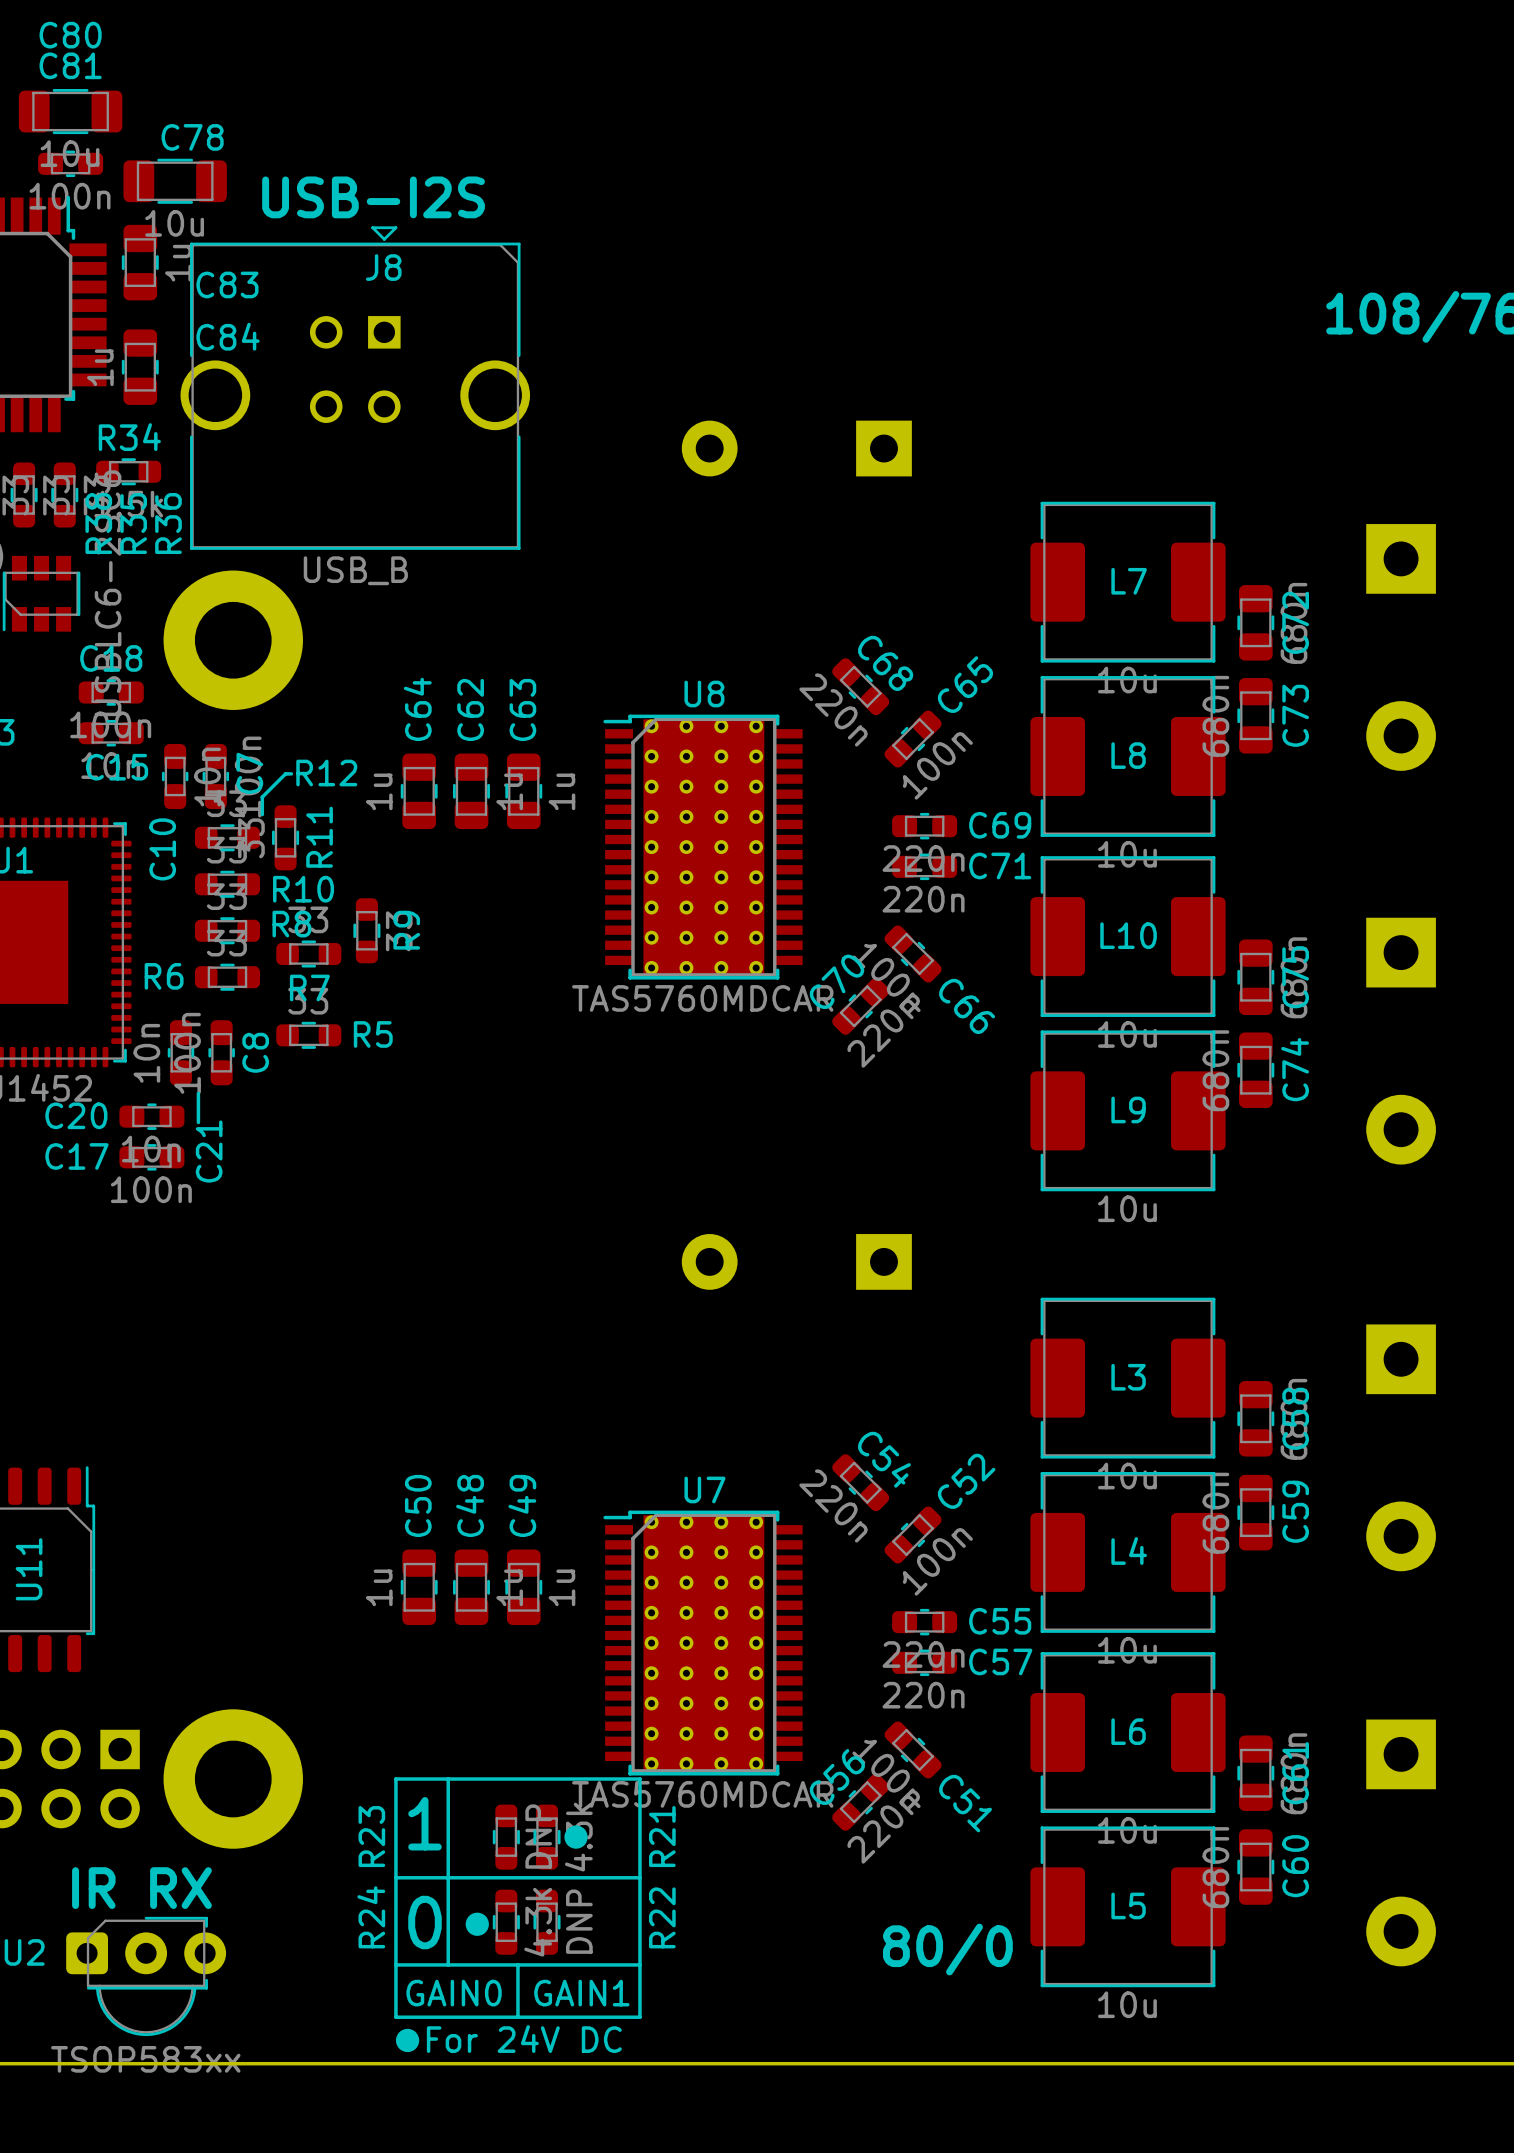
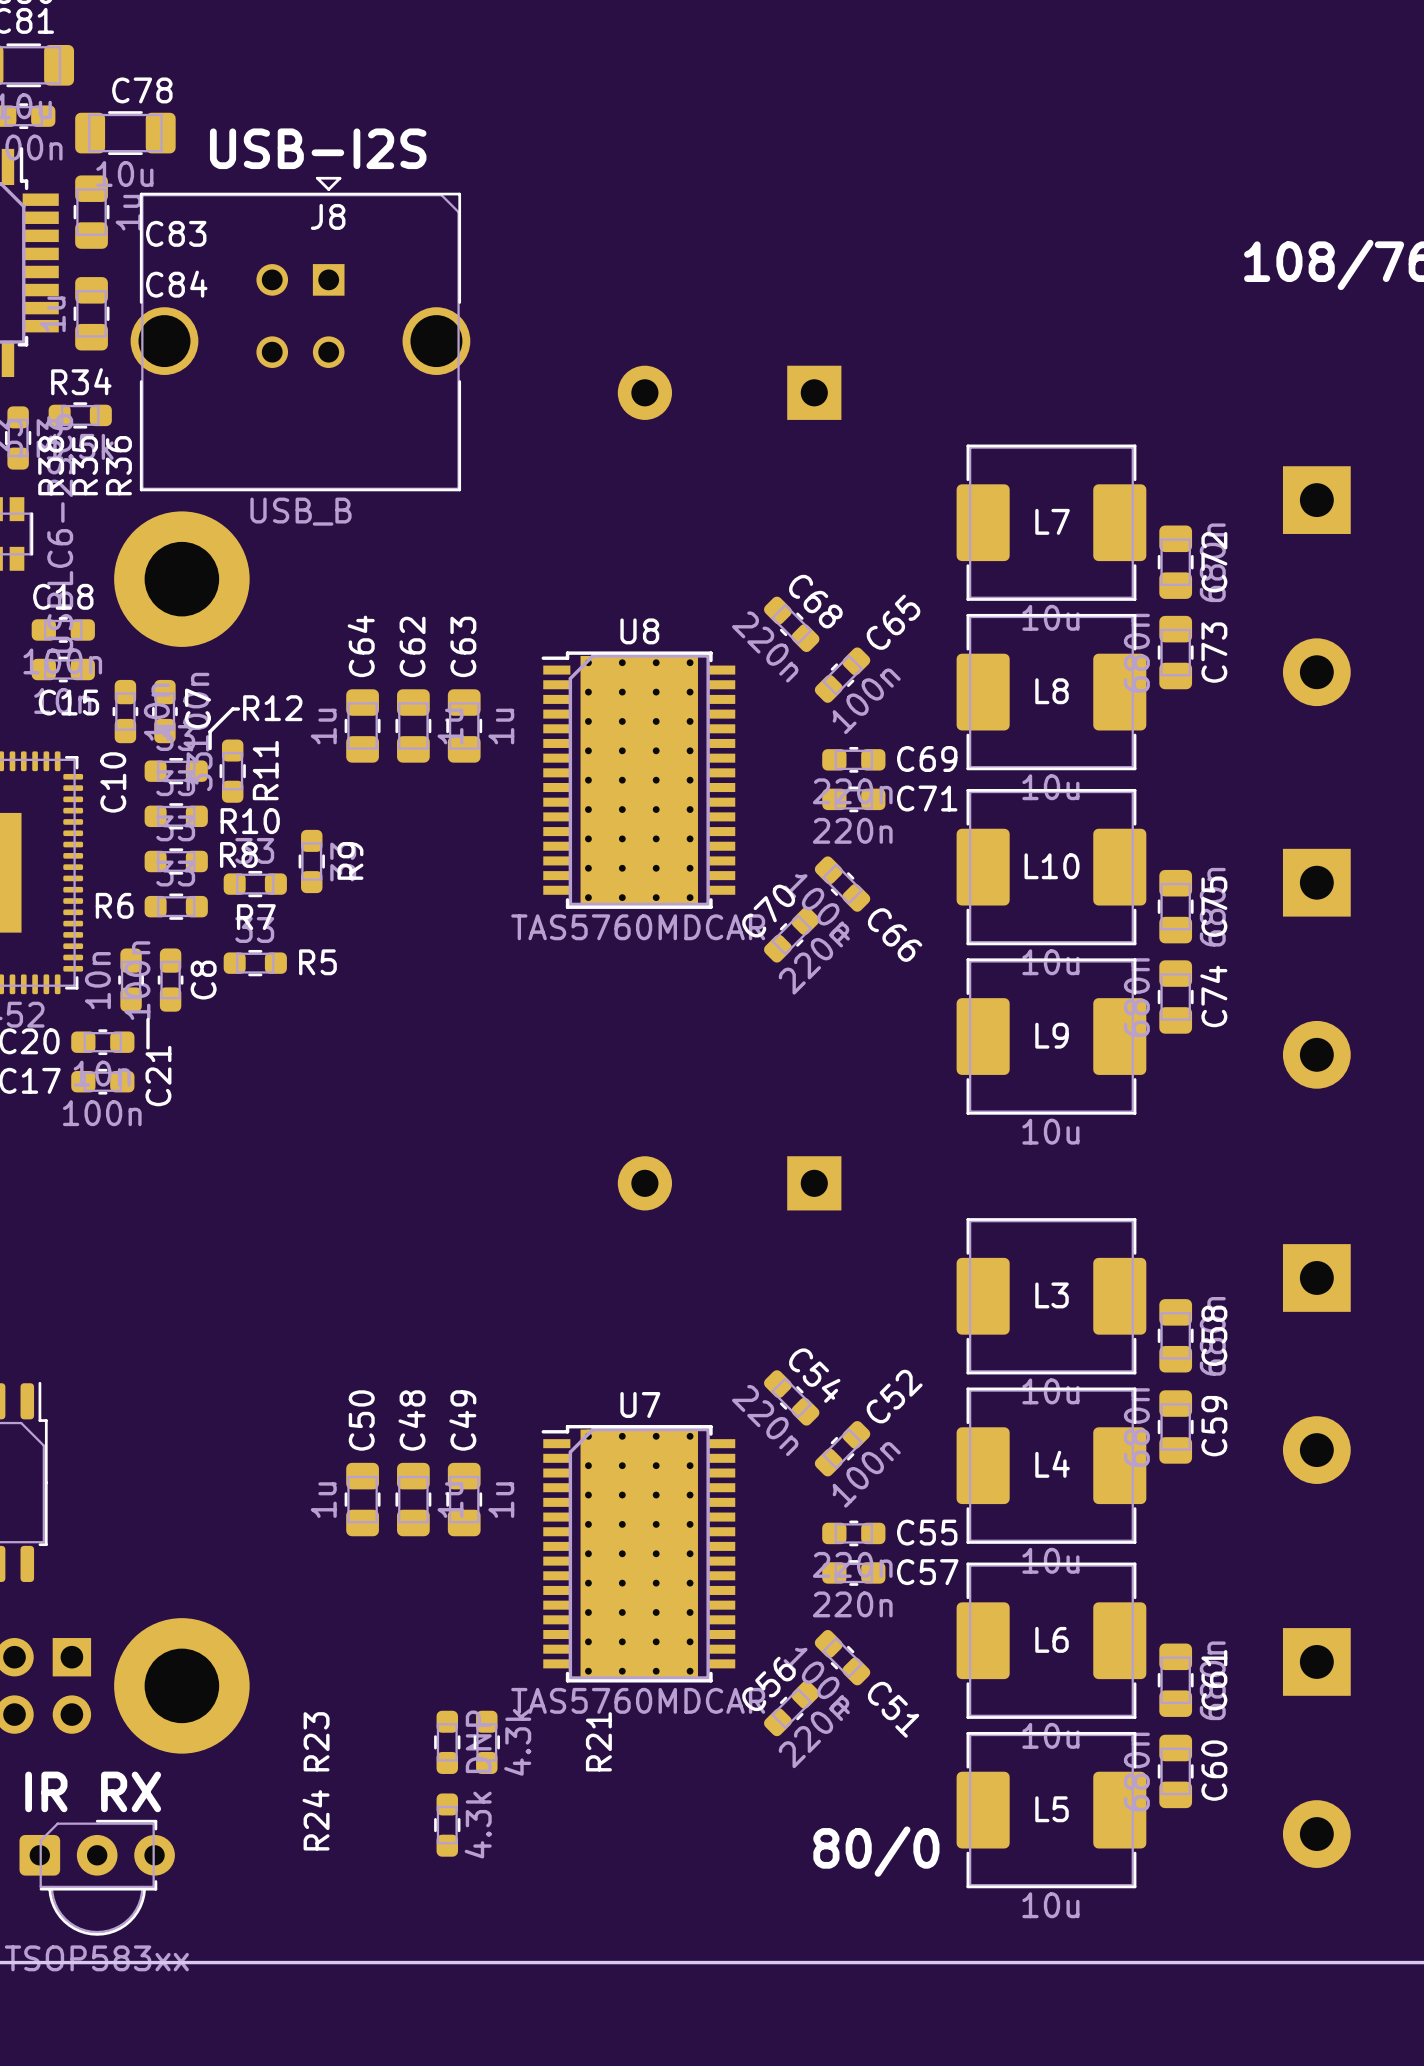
line: (395, 1779) (395, 2017) (639, 2017) (639, 1779) (395, 1779) -> none
line: (448, 1779) (448, 1964) -> none
text: 1 (425, 1823) -> none
drawing: [564, 1825, 588, 1849] -> none
line: (395, 1877) (639, 1877) -> none
drawing: [465, 1912, 489, 1936] -> none
text: 0 (425, 1922) -> none
R22: DNP (547, 1922) -> none
line: (395, 1964) (639, 1964) -> none
line: (517, 1964) (517, 2017) -> none
text: GAIN0 (454, 1993) -> none
text: GAIN1 (581, 1993) -> none
drawing: [395, 2028, 420, 2053] -> none
text: For 24V DC (524, 2039) -> none

